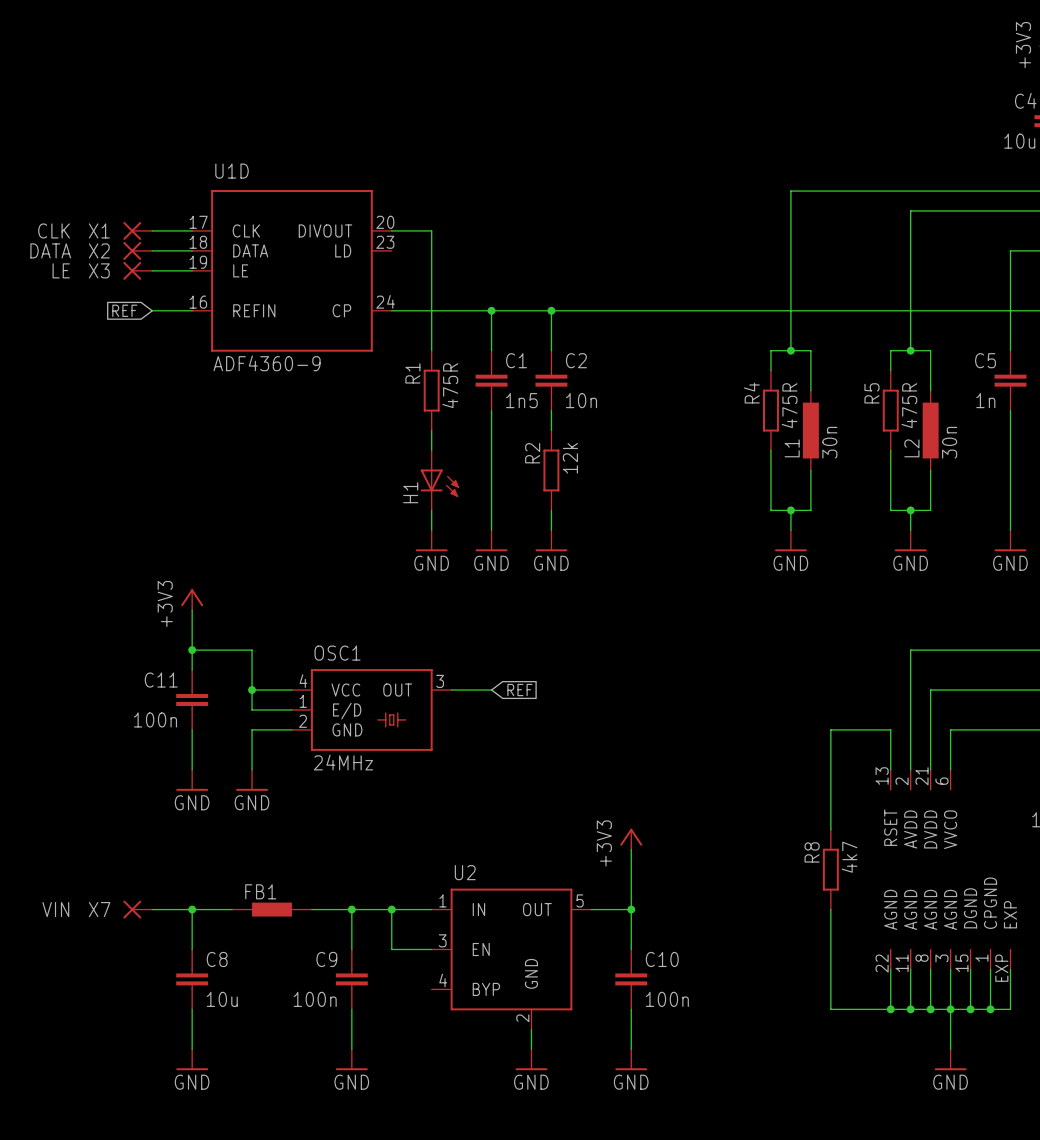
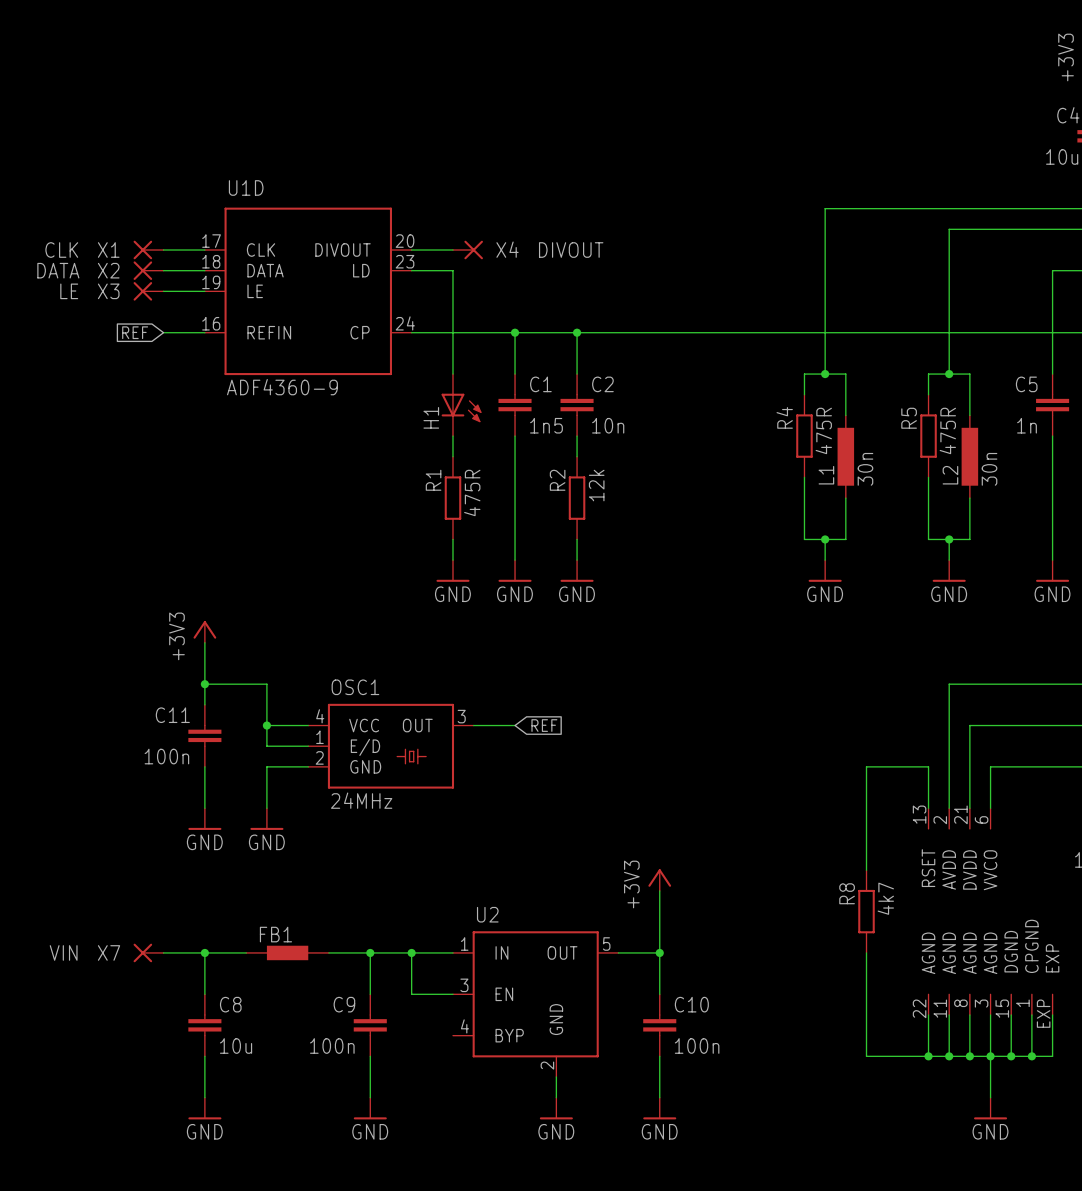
wire: (431, 230) (431, 250) -> (411, 270) (452, 270)
X4: none -> DIVOUT (467, 250)
R1 position: (431, 390) -> (452, 498)
H1 position: (439, 480) -> (461, 405)

